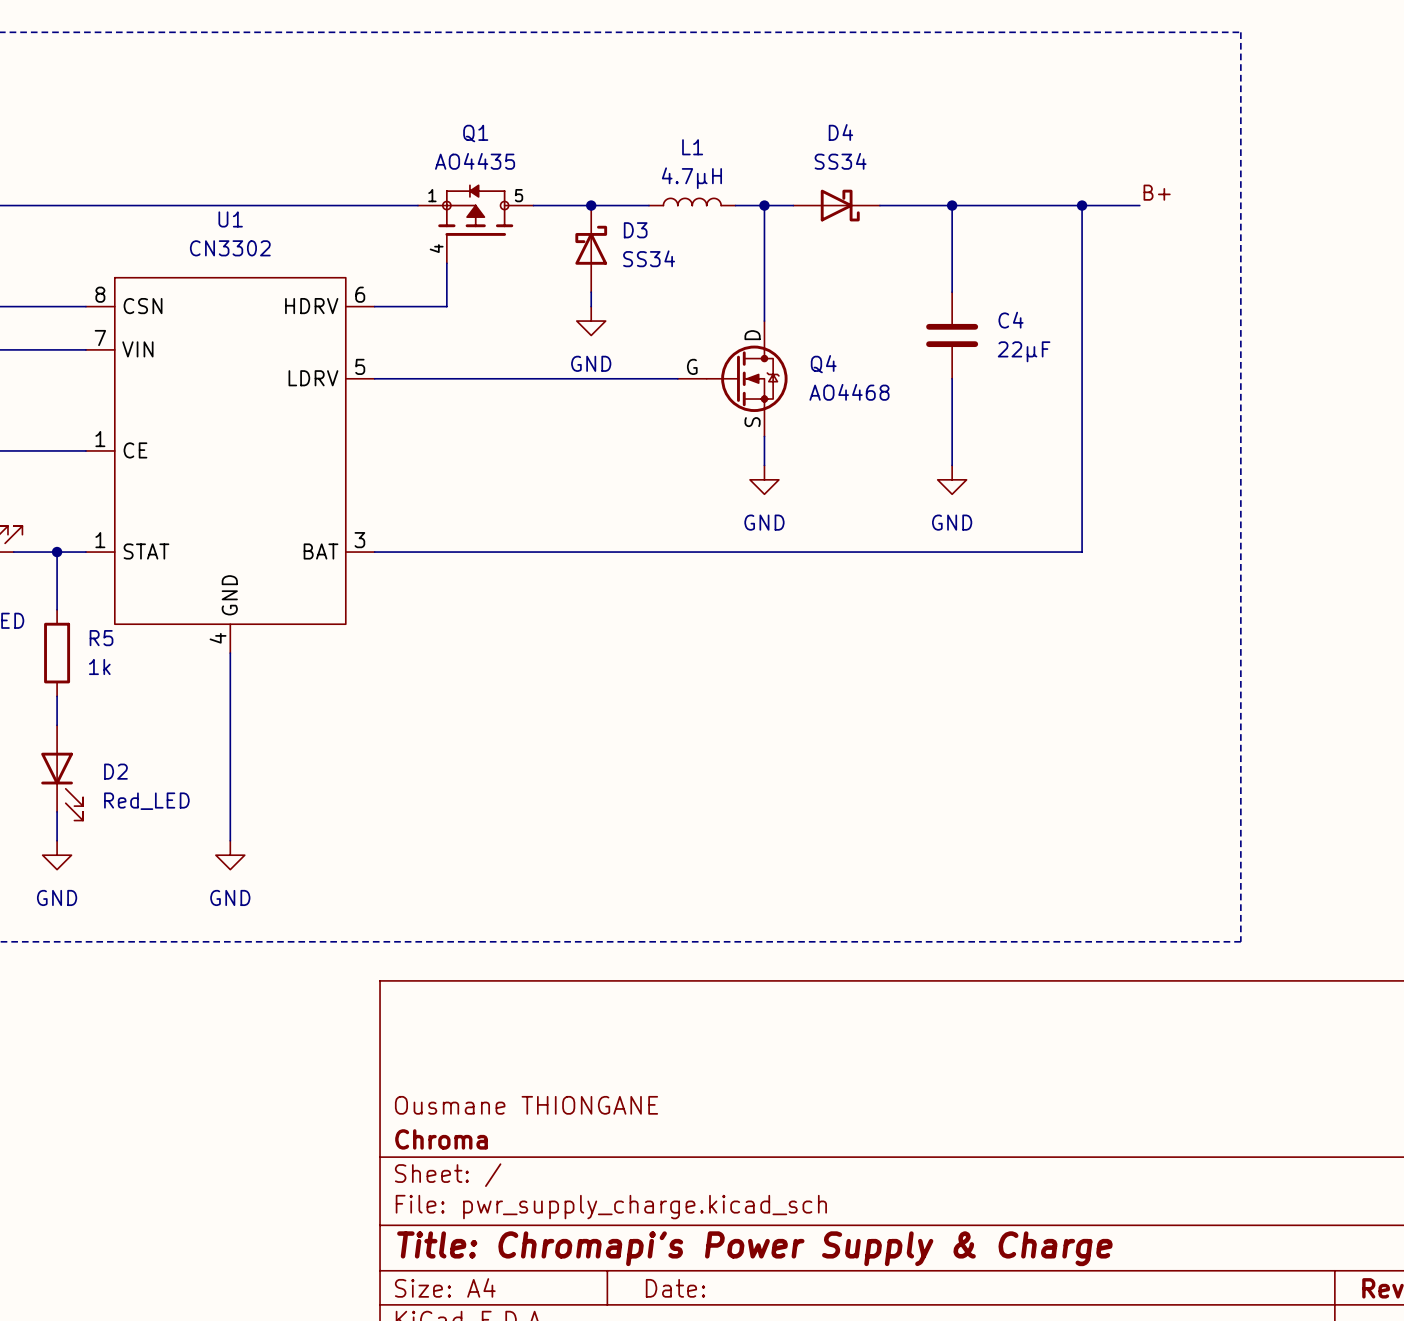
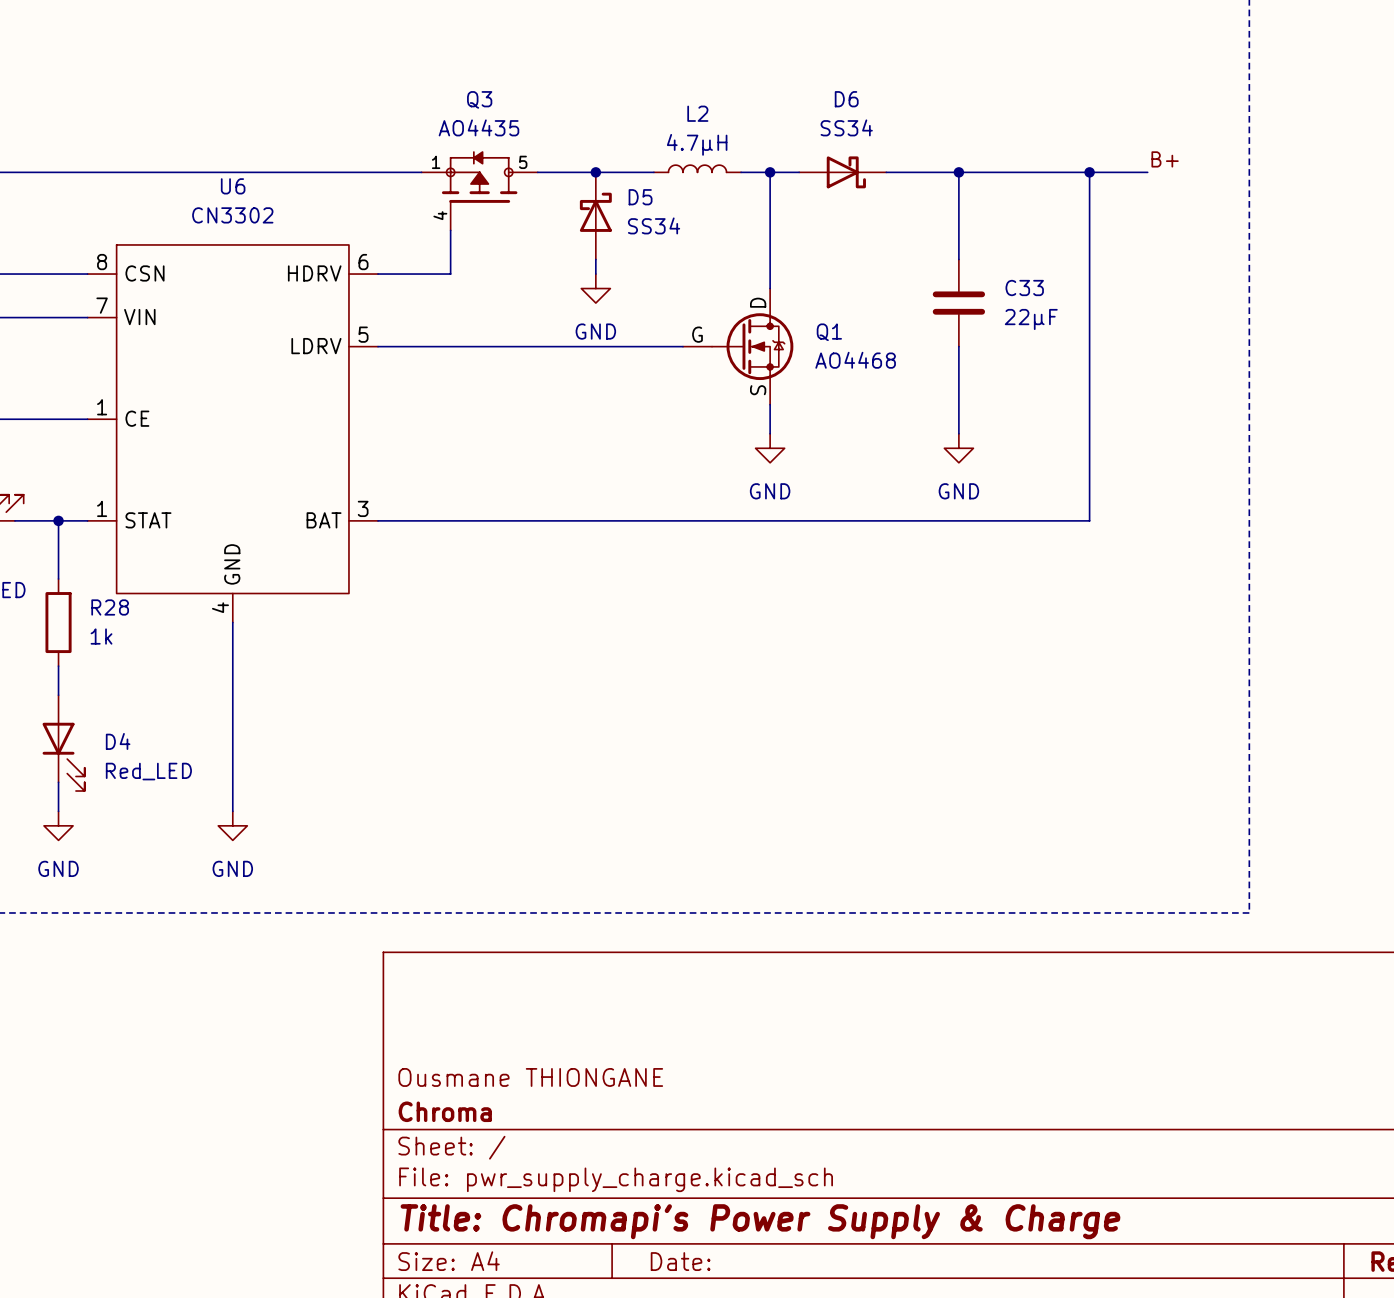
D4 name: D4 (840, 132) -> D6 (846, 99)
Q1 name: Q1 (475, 133) -> Q3 (479, 99)
L1 name: L1 (692, 147) -> L2 (697, 113)
U1 name: U1 (230, 219) -> U6 (233, 186)
D3 name: D3 (635, 230) -> D5 (640, 197)
C4 name: C4 (1011, 320) -> C33 (1024, 288)
Q4 name: Q4 (823, 364) -> Q1 (829, 332)
R5 name: R5 (101, 638) -> R28 (110, 607)
D2 name: D2 (115, 771) -> D4 (118, 741)

